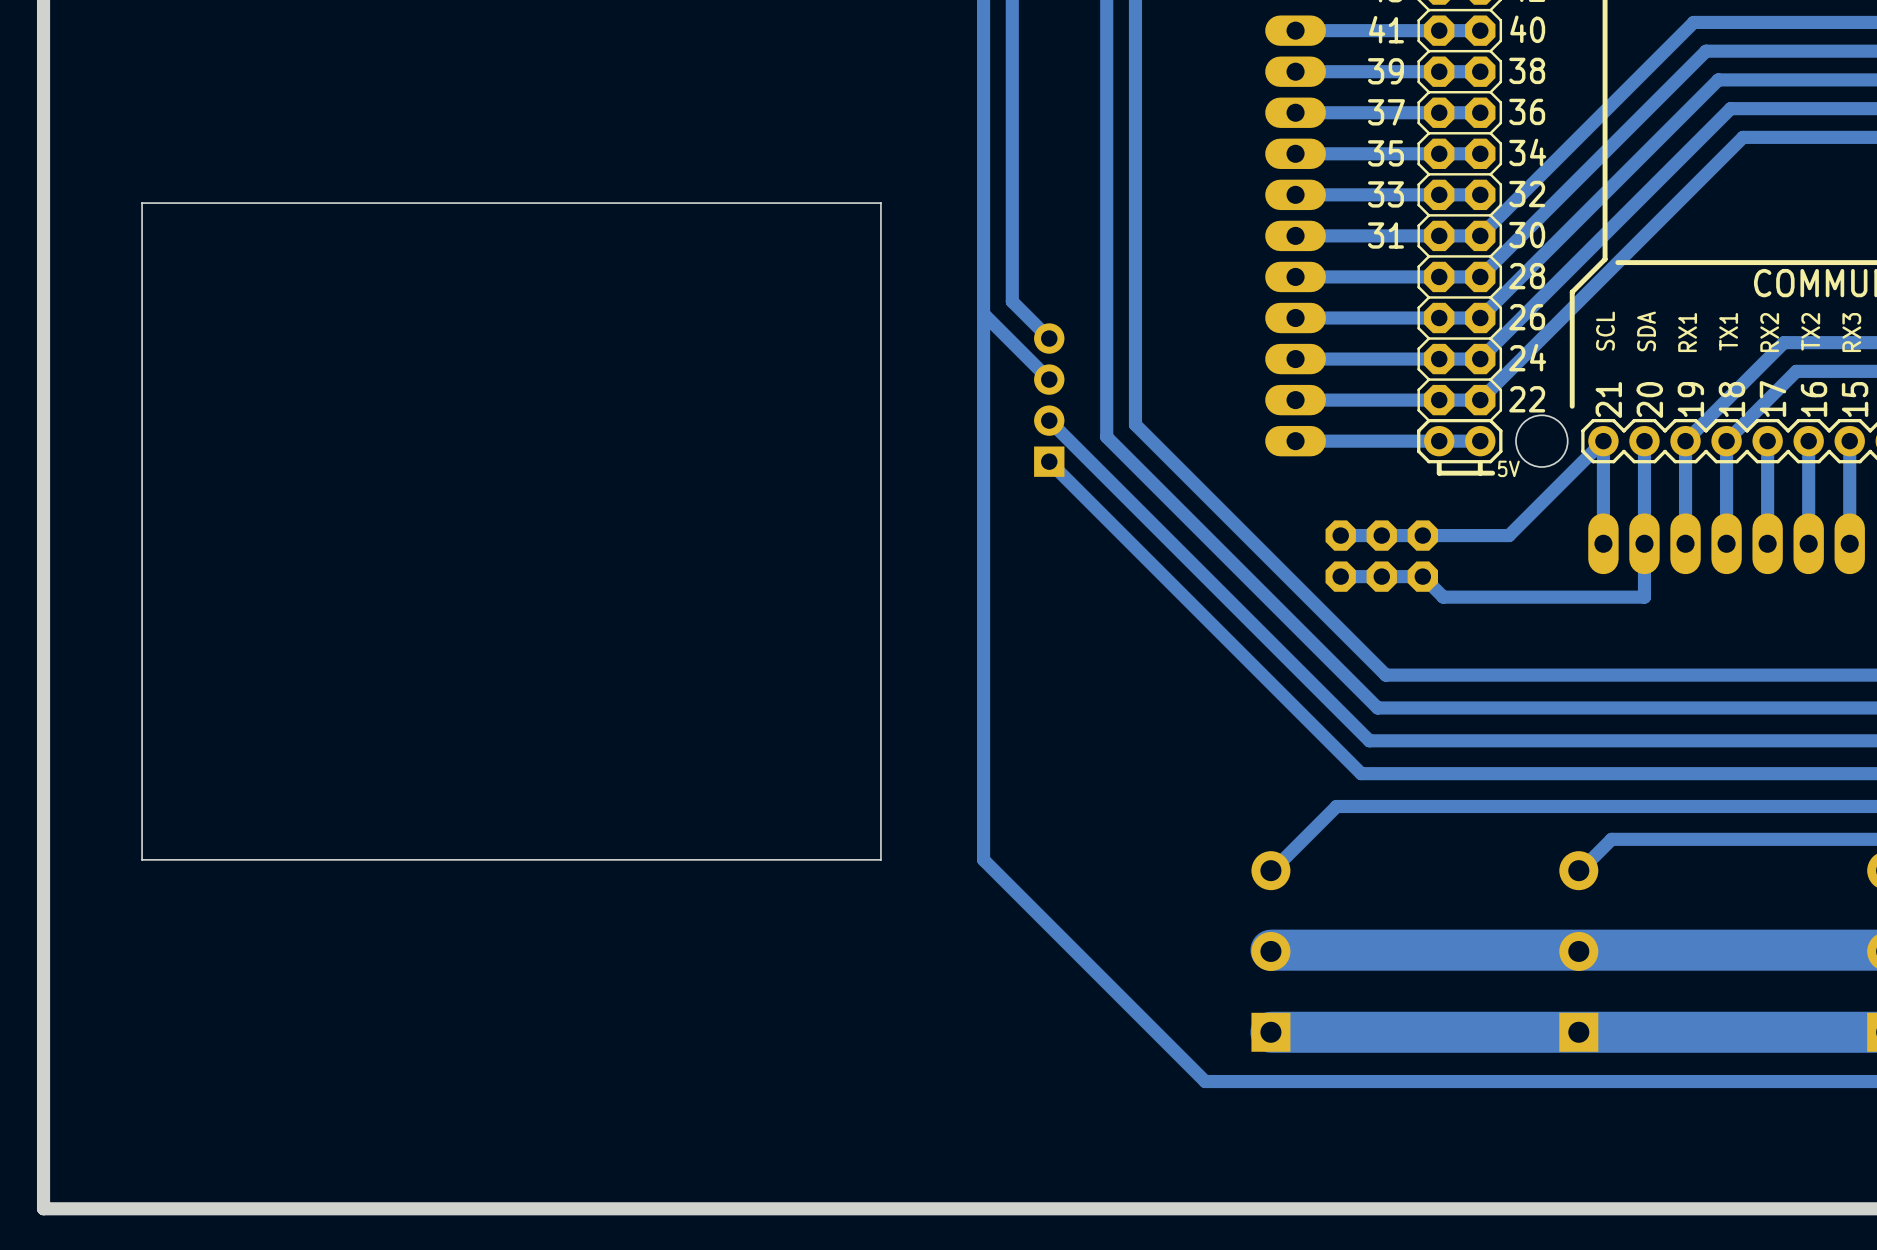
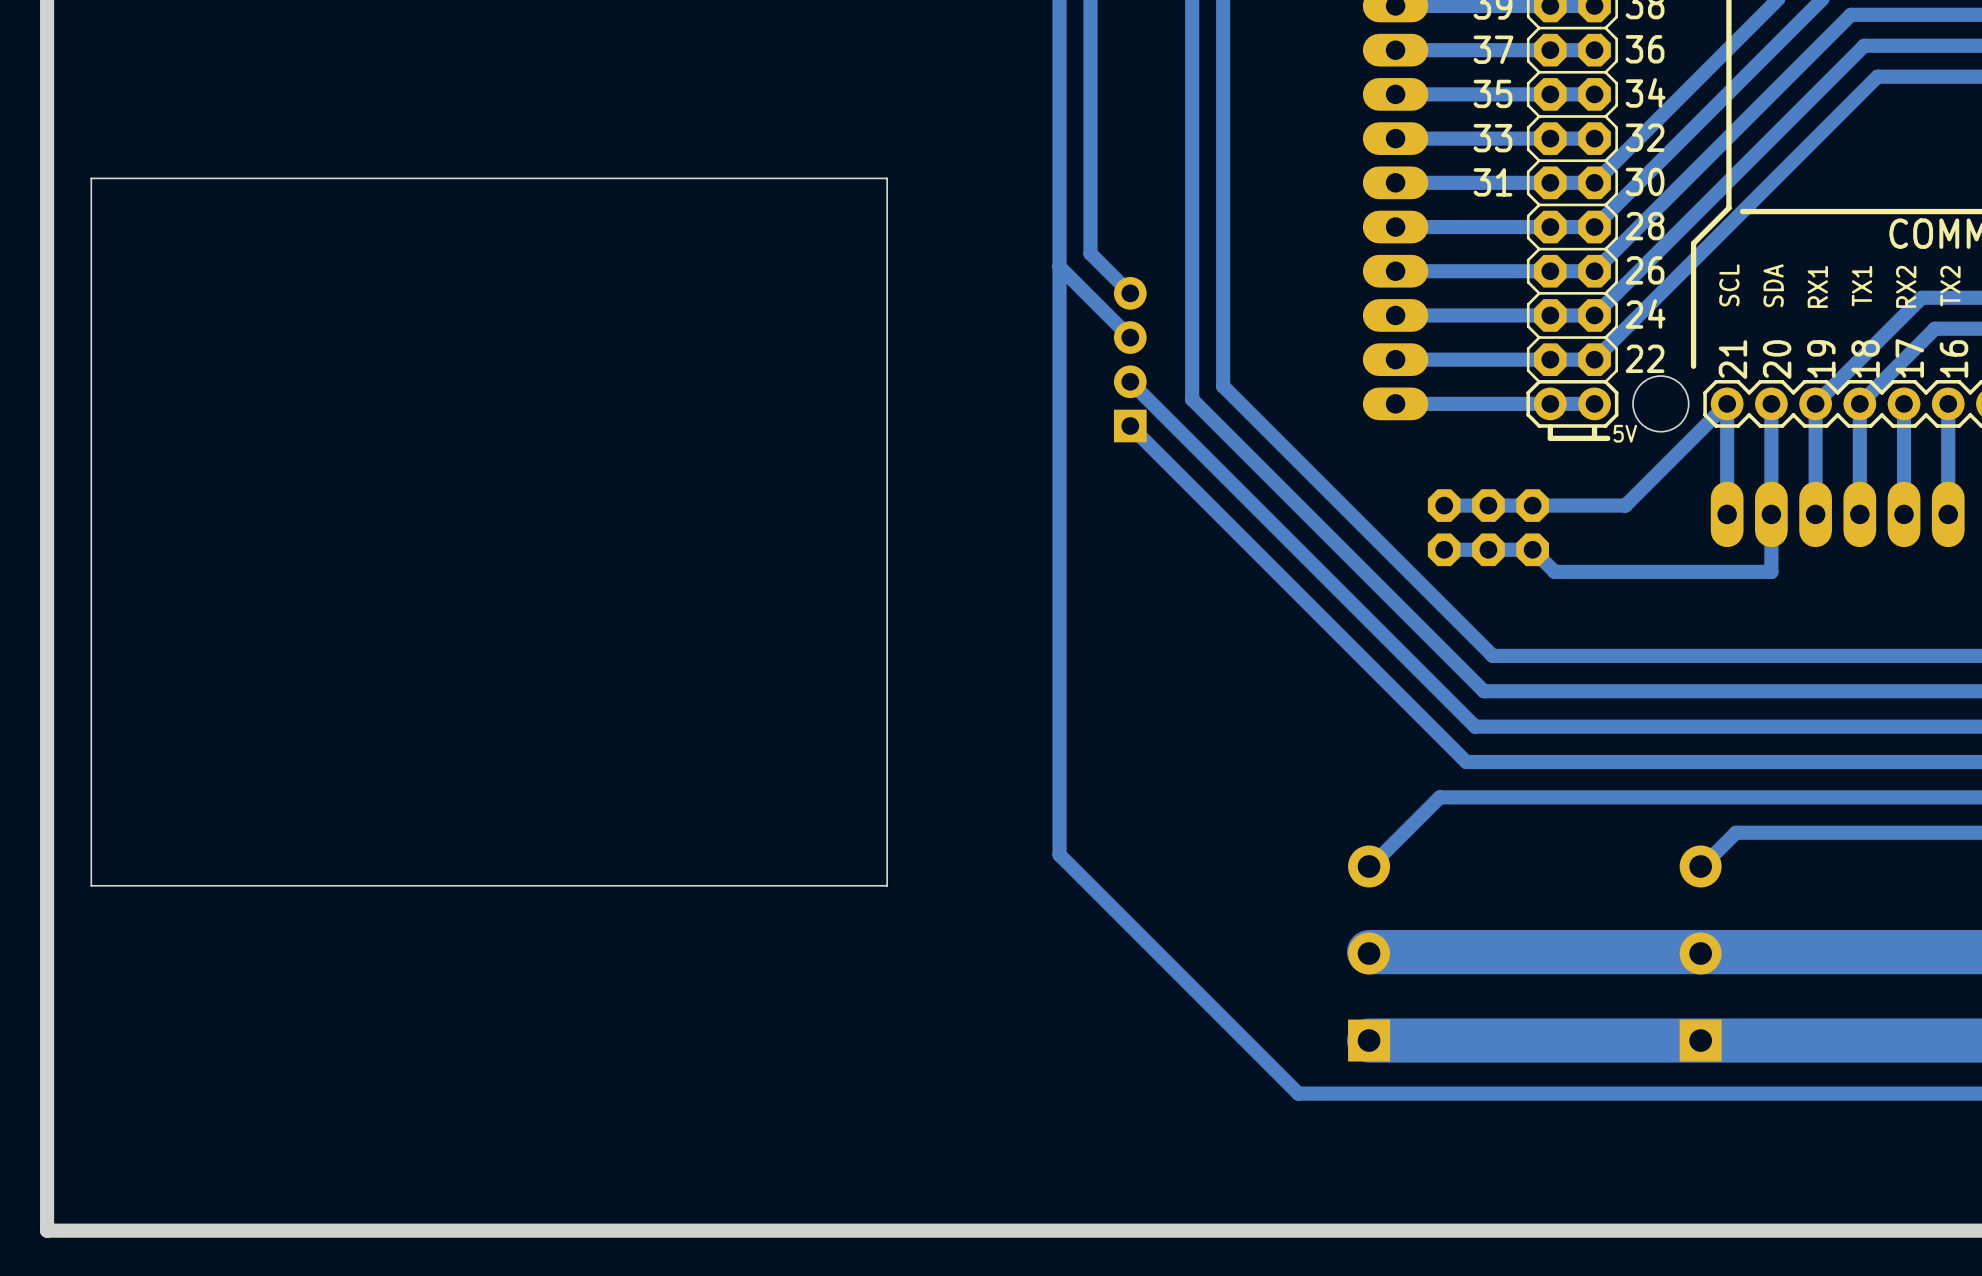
board edge: (880, 203) (142, 203) (142, 859) (880, 859) (880, 203) -> (887, 178) (887, 885) (91, 885) (91, 178) (887, 178)

